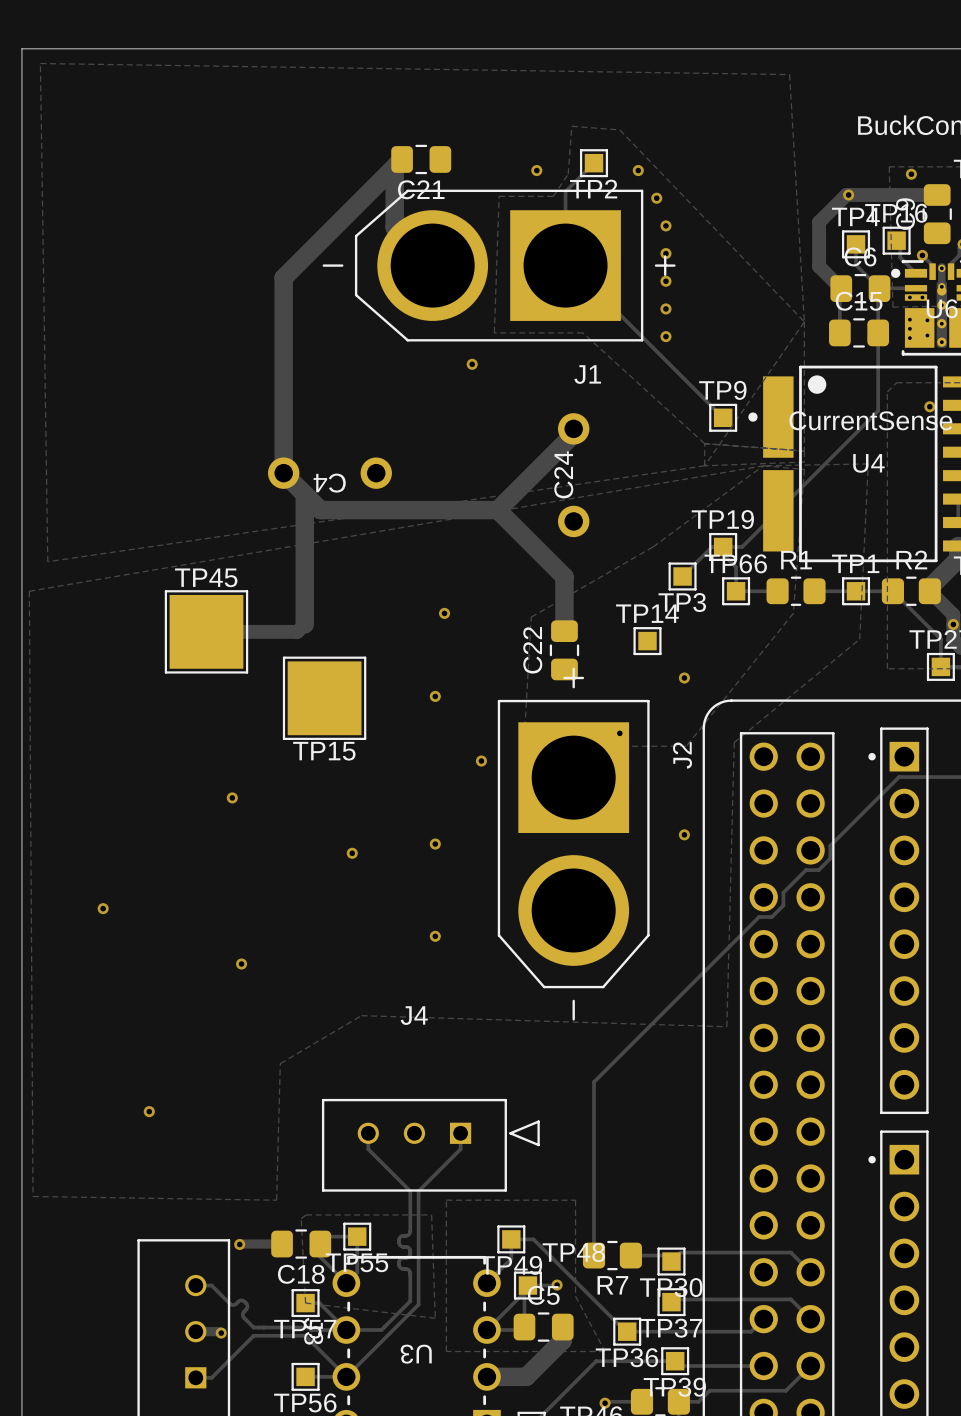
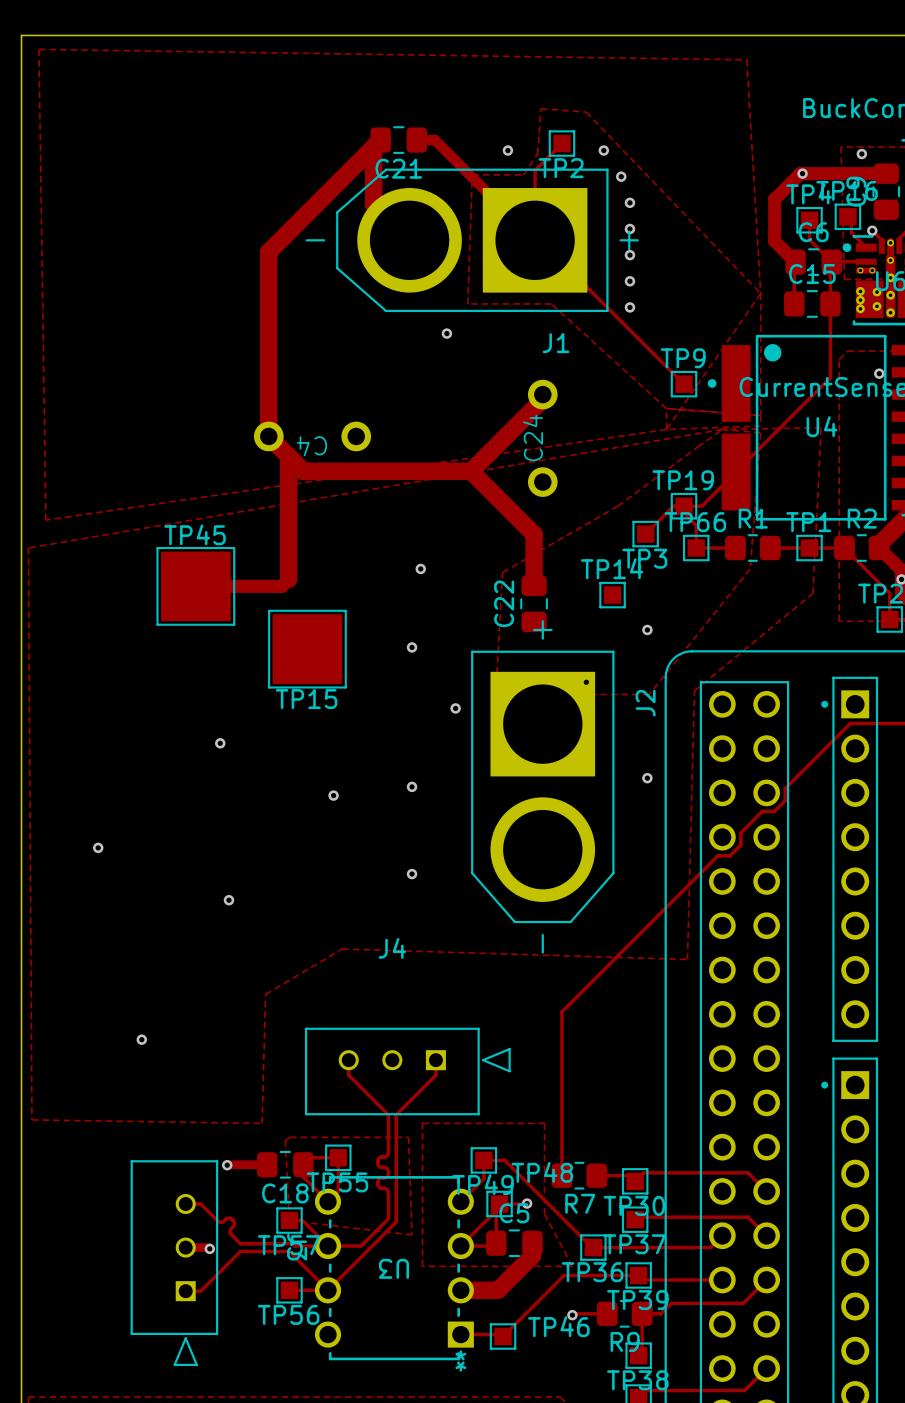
track: none -> (416, 140) (434, 140) (535, 240)

